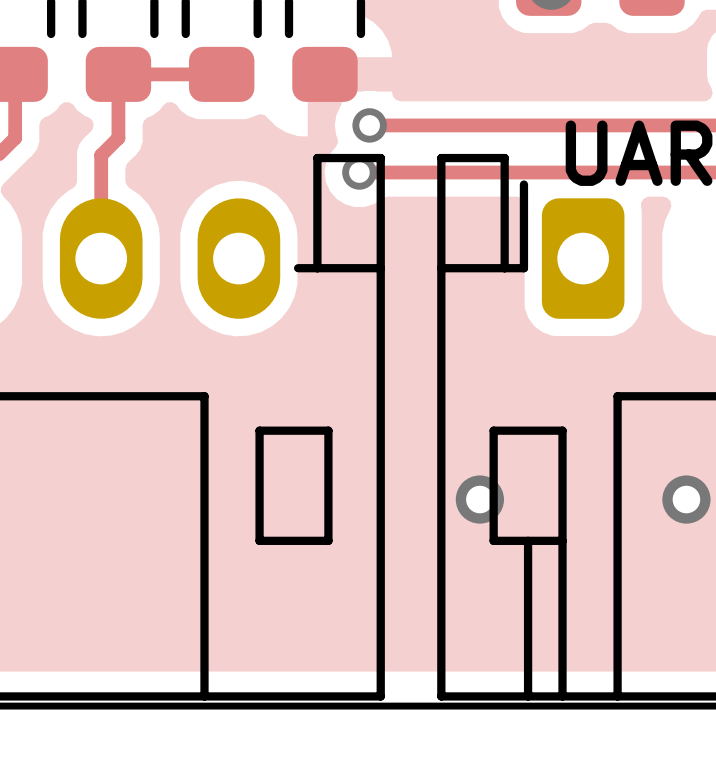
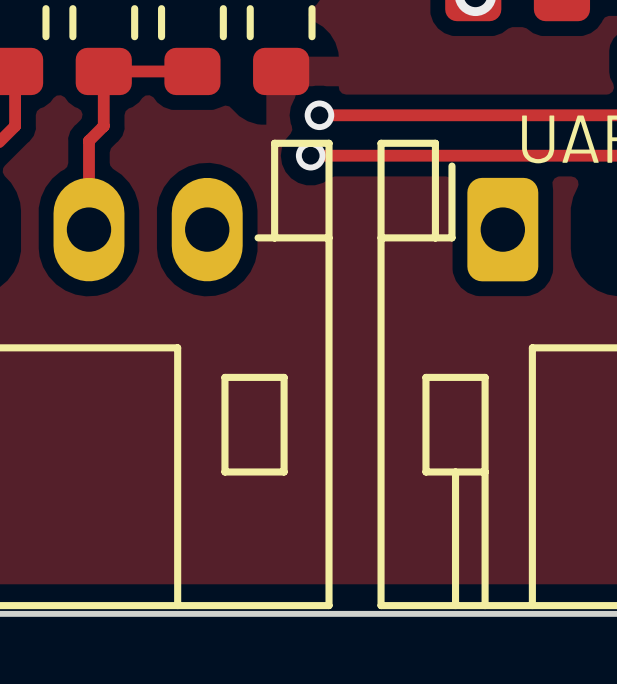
via: (479, 499) -> none
via: (686, 499) -> none

